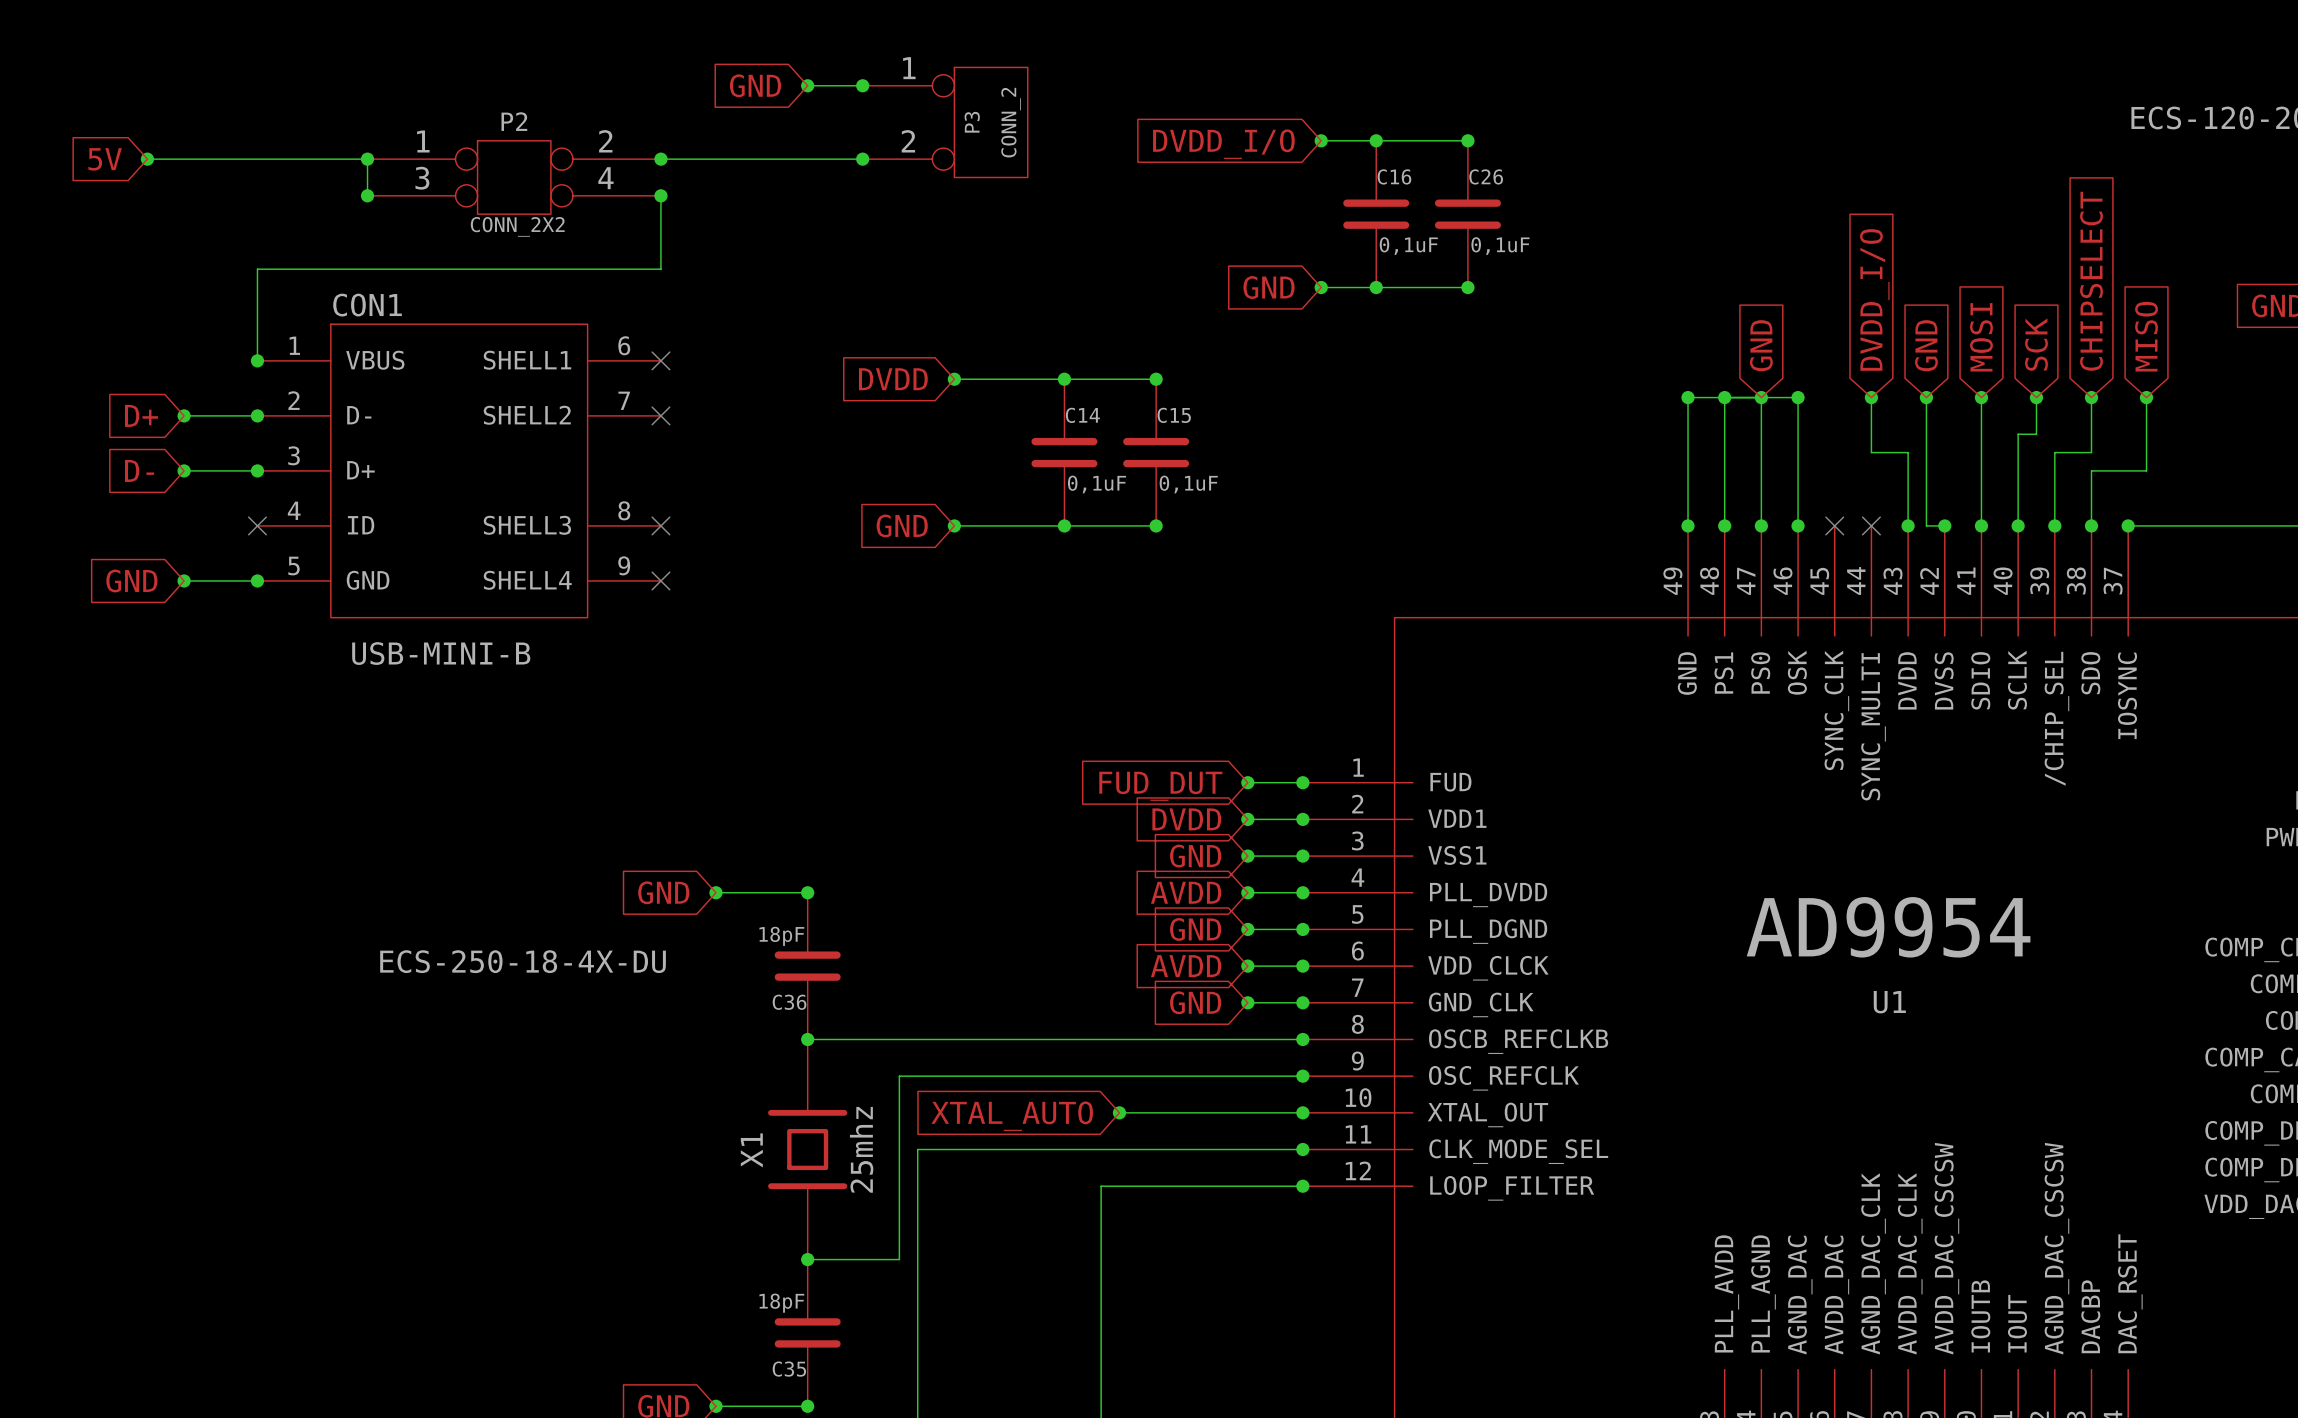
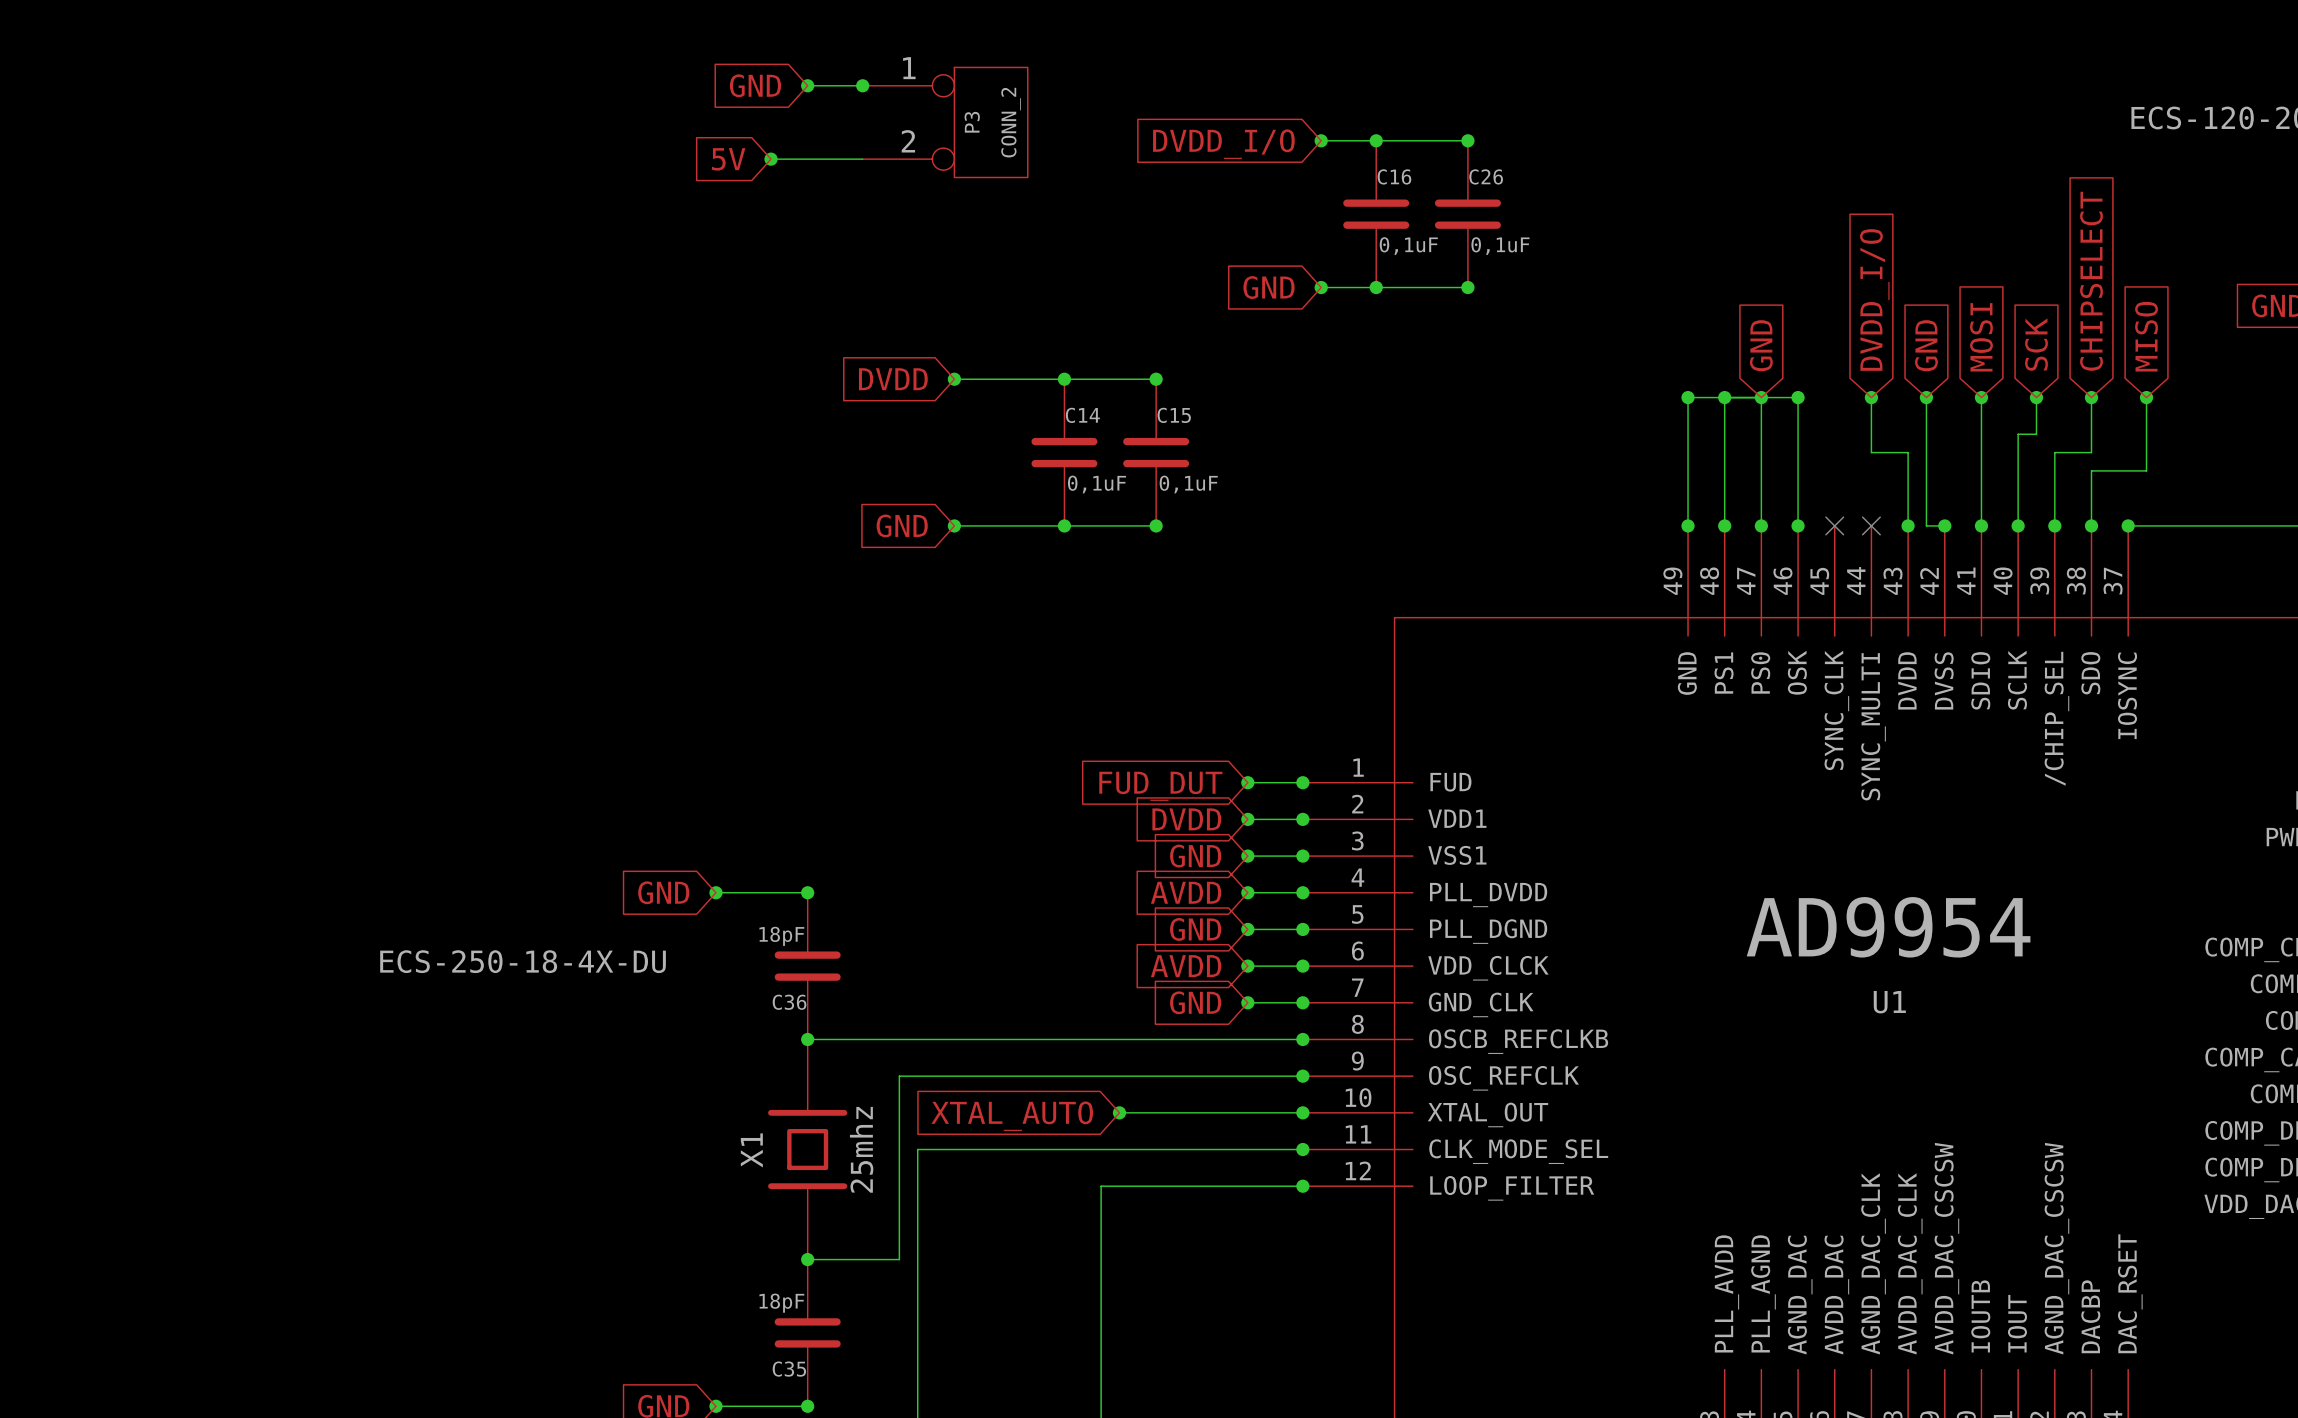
global label: 5V (105, 159) -> none
wire: (147, 159) (367, 159) (367, 195) -> none
junction: (147, 159) -> none
junction: (367, 159) -> none
wire: (660, 159) (770, 159) -> none
junction: (660, 159) -> none
global label: none -> 5V (728, 159)
junction: none -> (770, 159)
junction: (862, 159) -> none
P2: CONN_2X2 (514, 177) -> none
junction: (367, 195) -> none
wire: (660, 195) (660, 269) (257, 269) (257, 360) -> none
junction: (660, 195) -> none
junction: (257, 360) -> none
no-connect mark: (660, 360) -> none
global label: D+ (141, 415) -> none
wire: (184, 415) (257, 415) -> none
junction: (184, 415) -> none
junction: (257, 415) -> none
no-connect mark: (660, 415) -> none
global label: D- (139, 470) -> none
wire: (184, 470) (257, 470) -> none
junction: (184, 470) -> none
junction: (257, 470) -> none
CON1: USB-MINI-B (459, 470) -> none
no-connect mark: (257, 525) -> none
no-connect mark: (660, 525) -> none
global label: GND (131, 580) -> none
wire: (184, 580) (257, 580) -> none
junction: (184, 580) -> none
junction: (257, 580) -> none
no-connect mark: (660, 580) -> none

